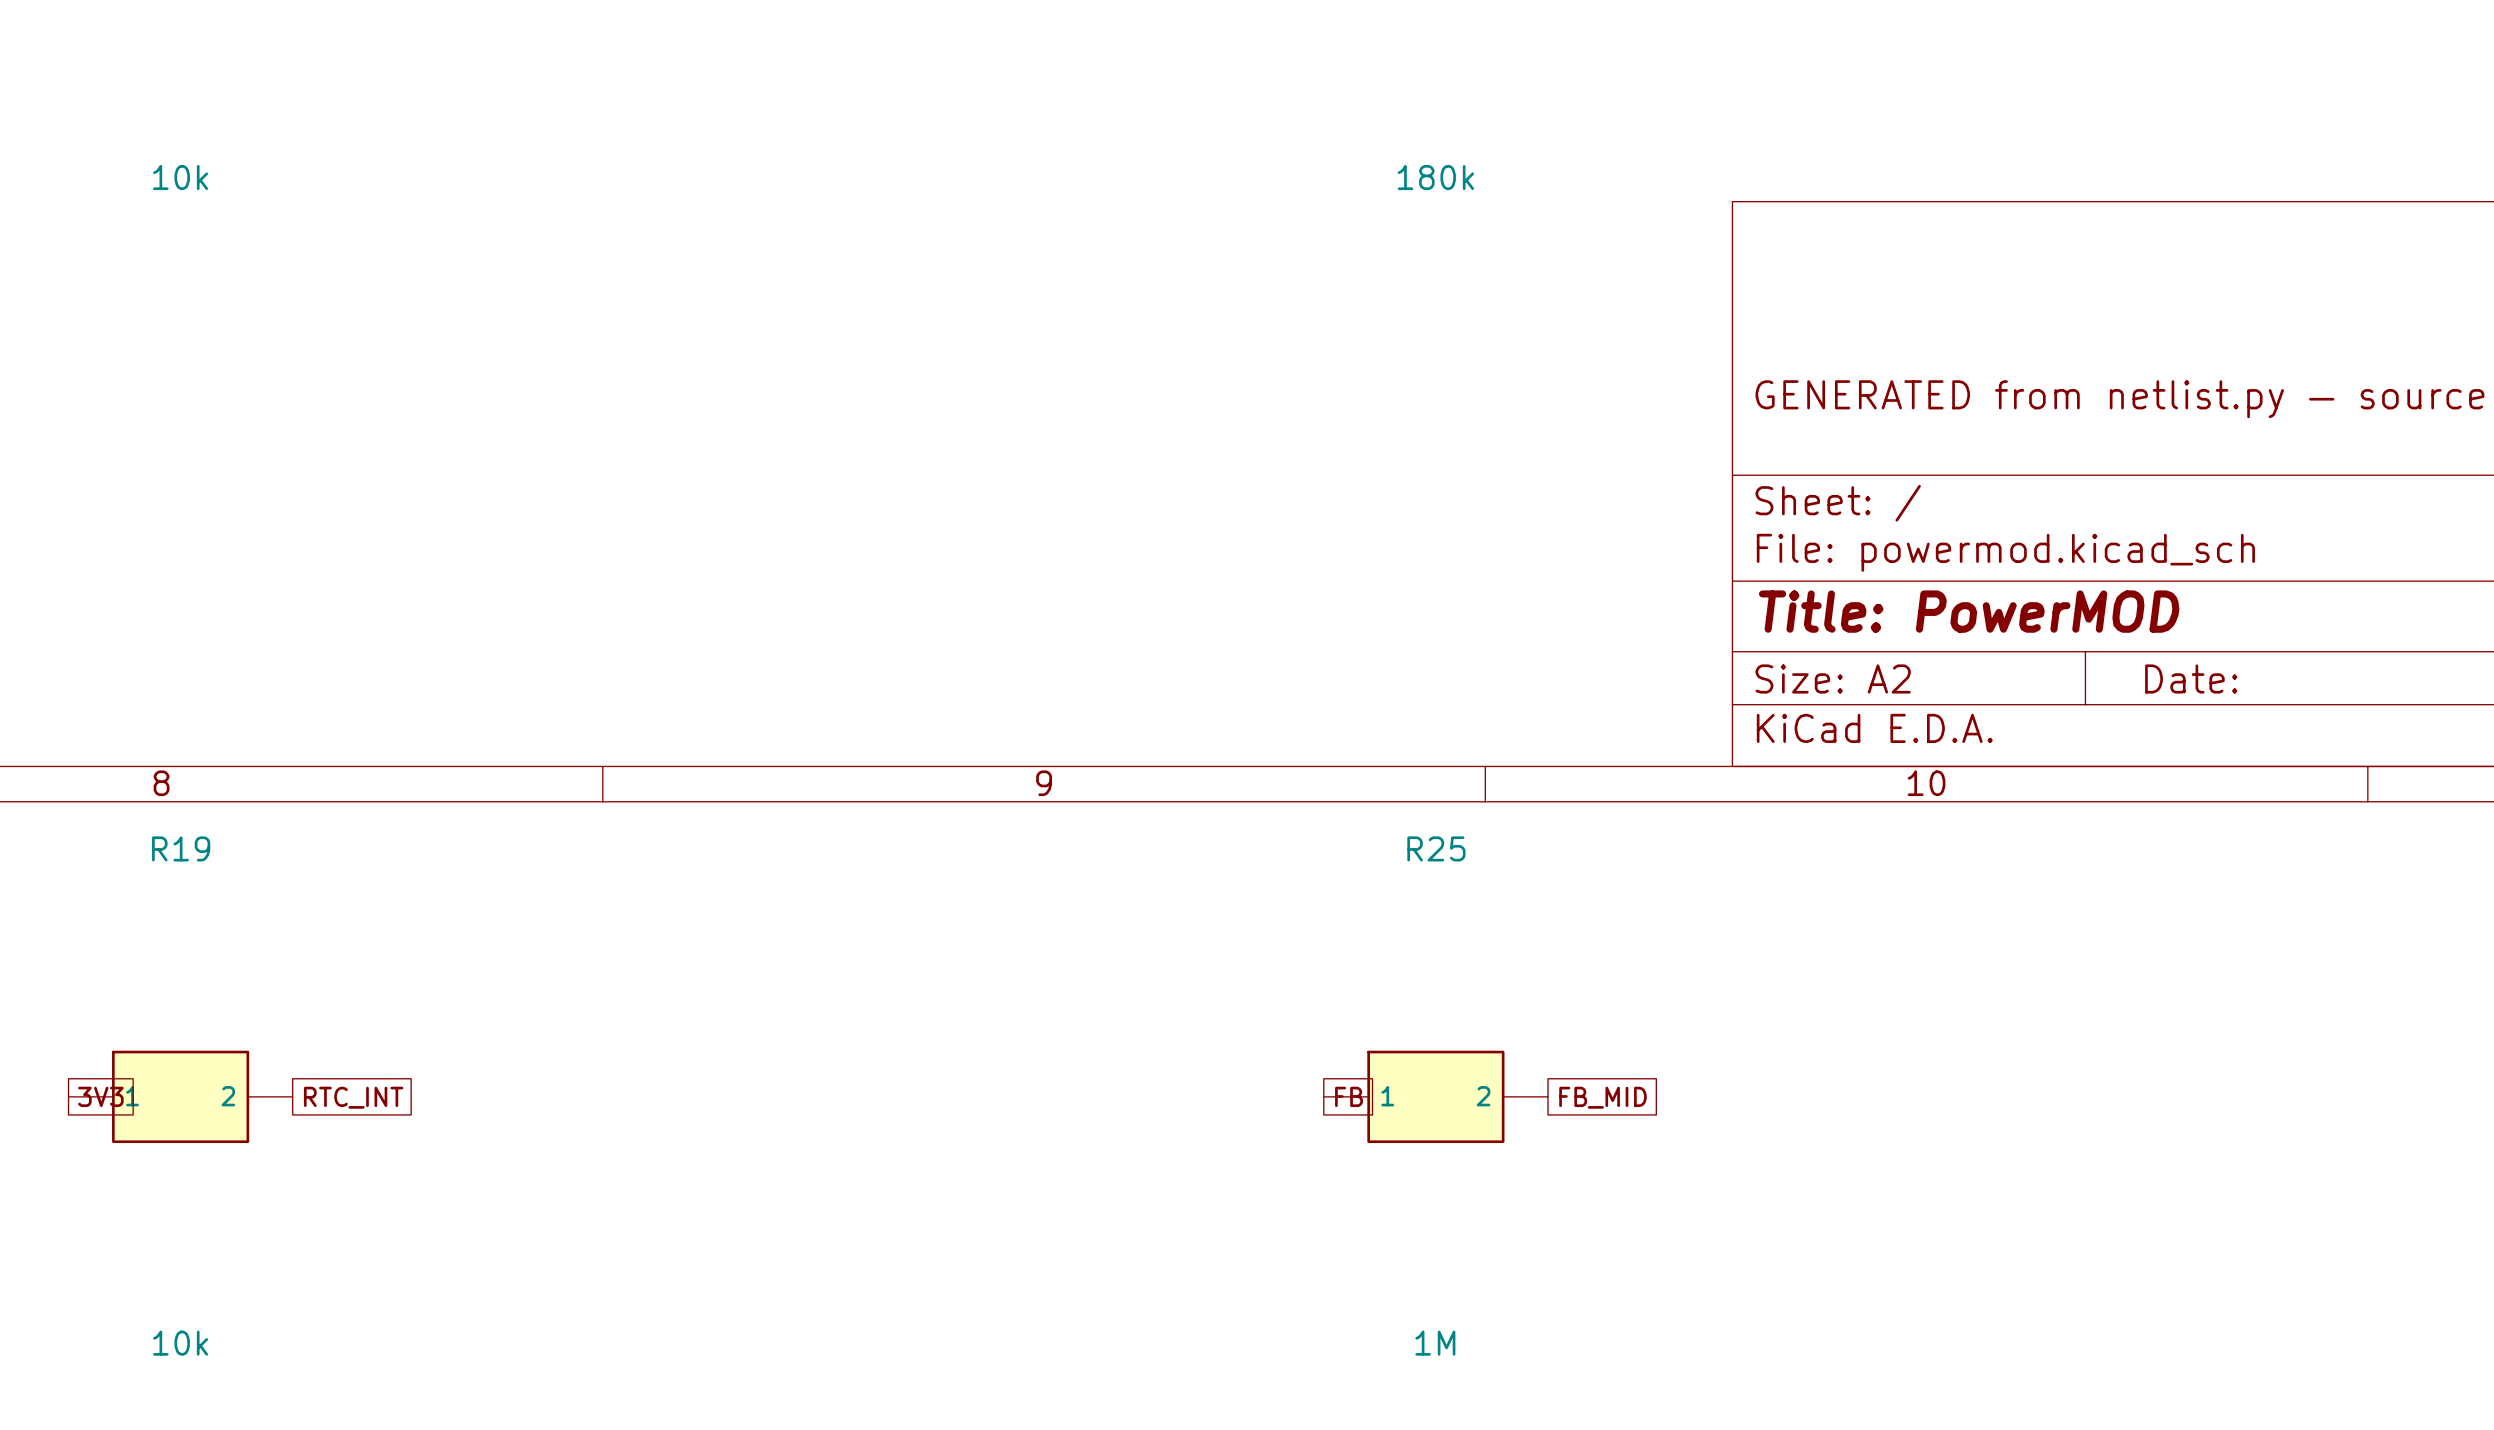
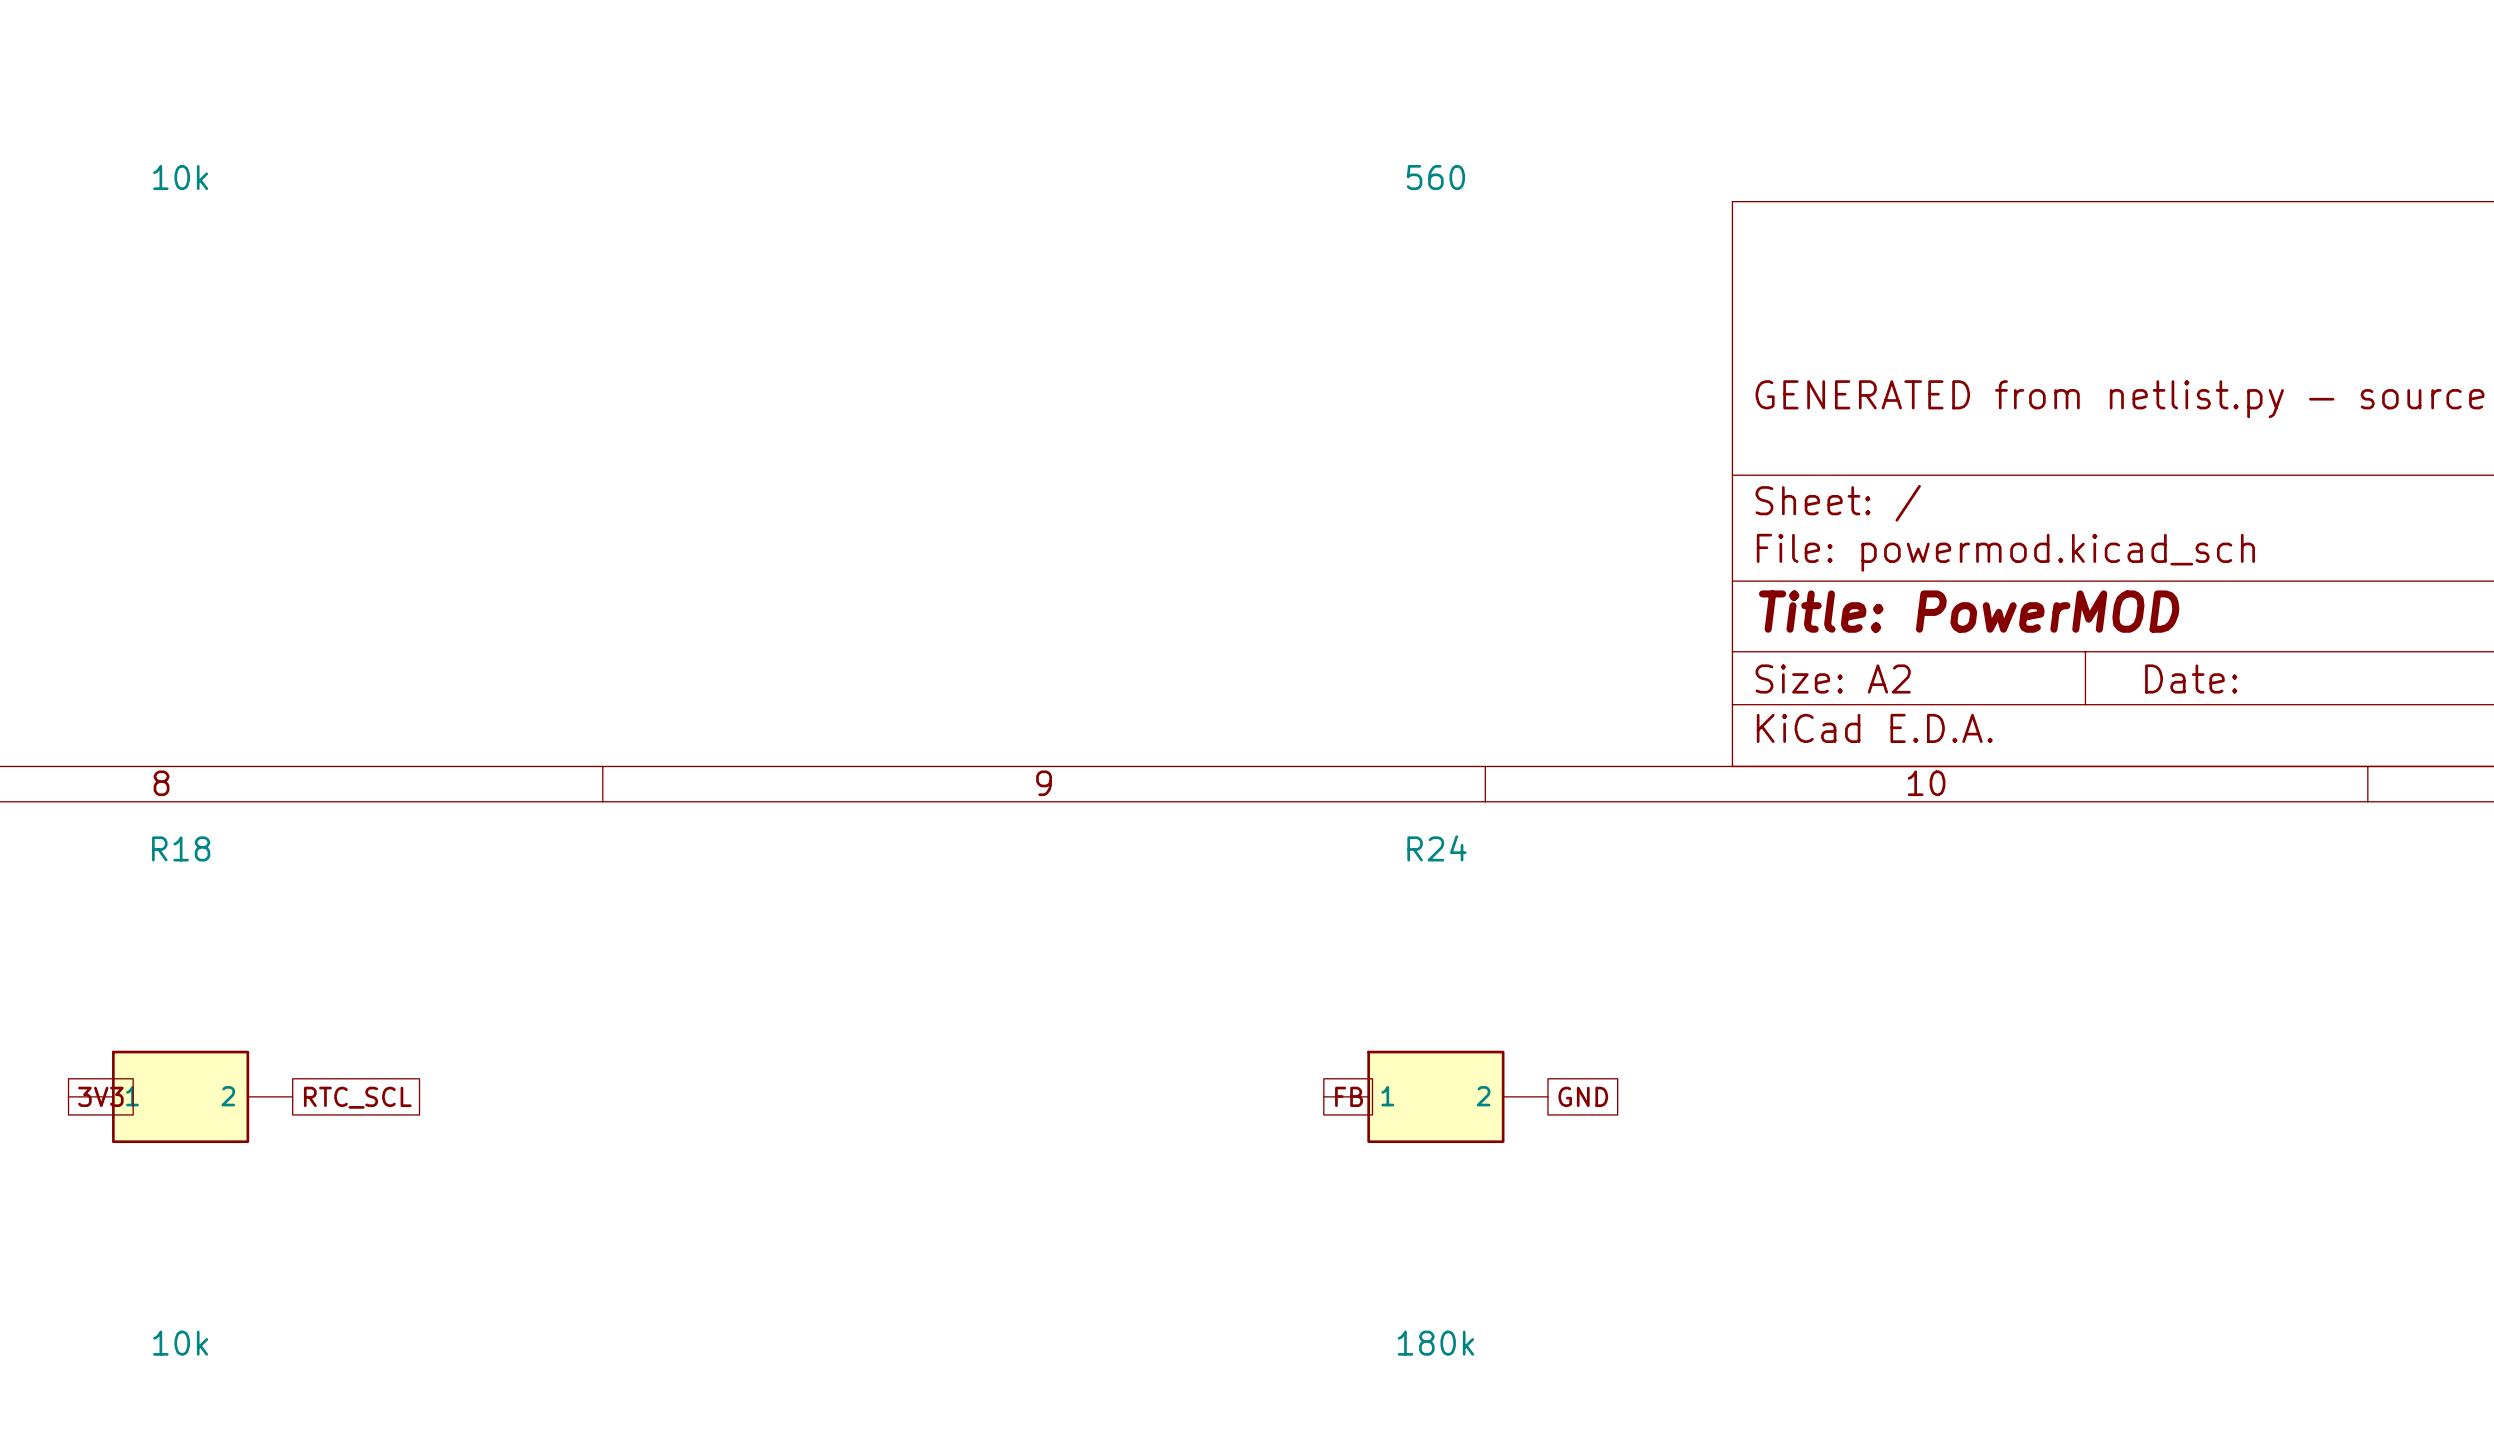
part value: 180k (1435, 177) -> 560 (1435, 177)
R19 name: R19 (181, 848) -> R18 (181, 848)
R25 name: R25 (1436, 848) -> R24 (1436, 848)
global label: RTC_INT (353, 1097) -> RTC_SCL (357, 1097)
global label: FB_MID (1603, 1097) -> GND (1583, 1096)
R25 value: 1M (1435, 1343) -> 180k (1435, 1343)

